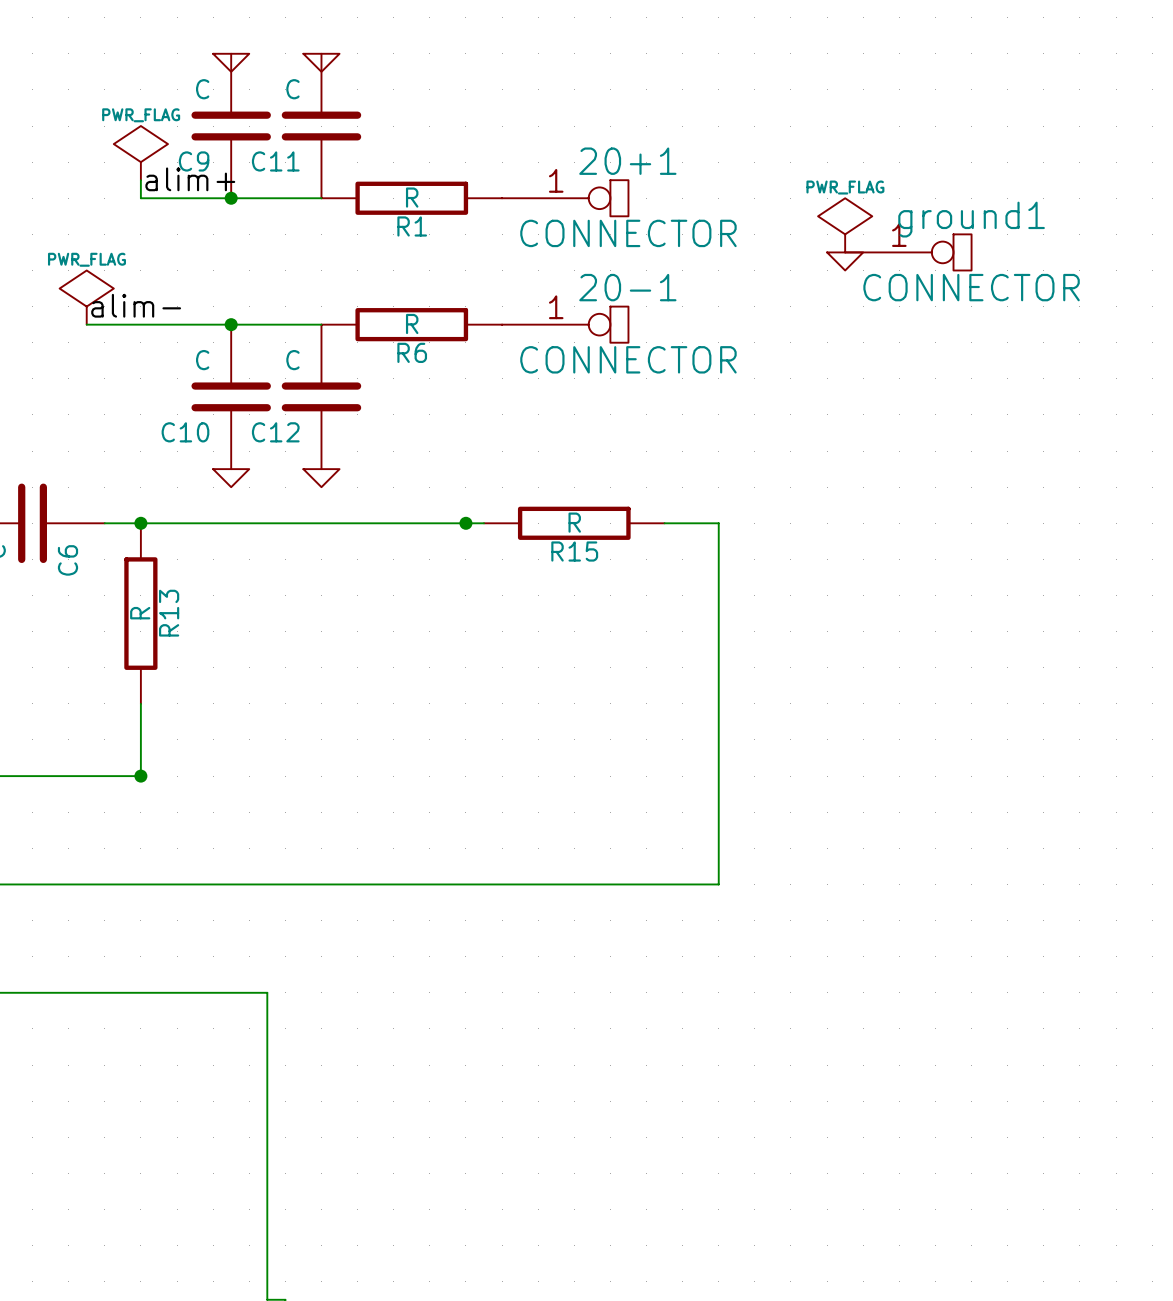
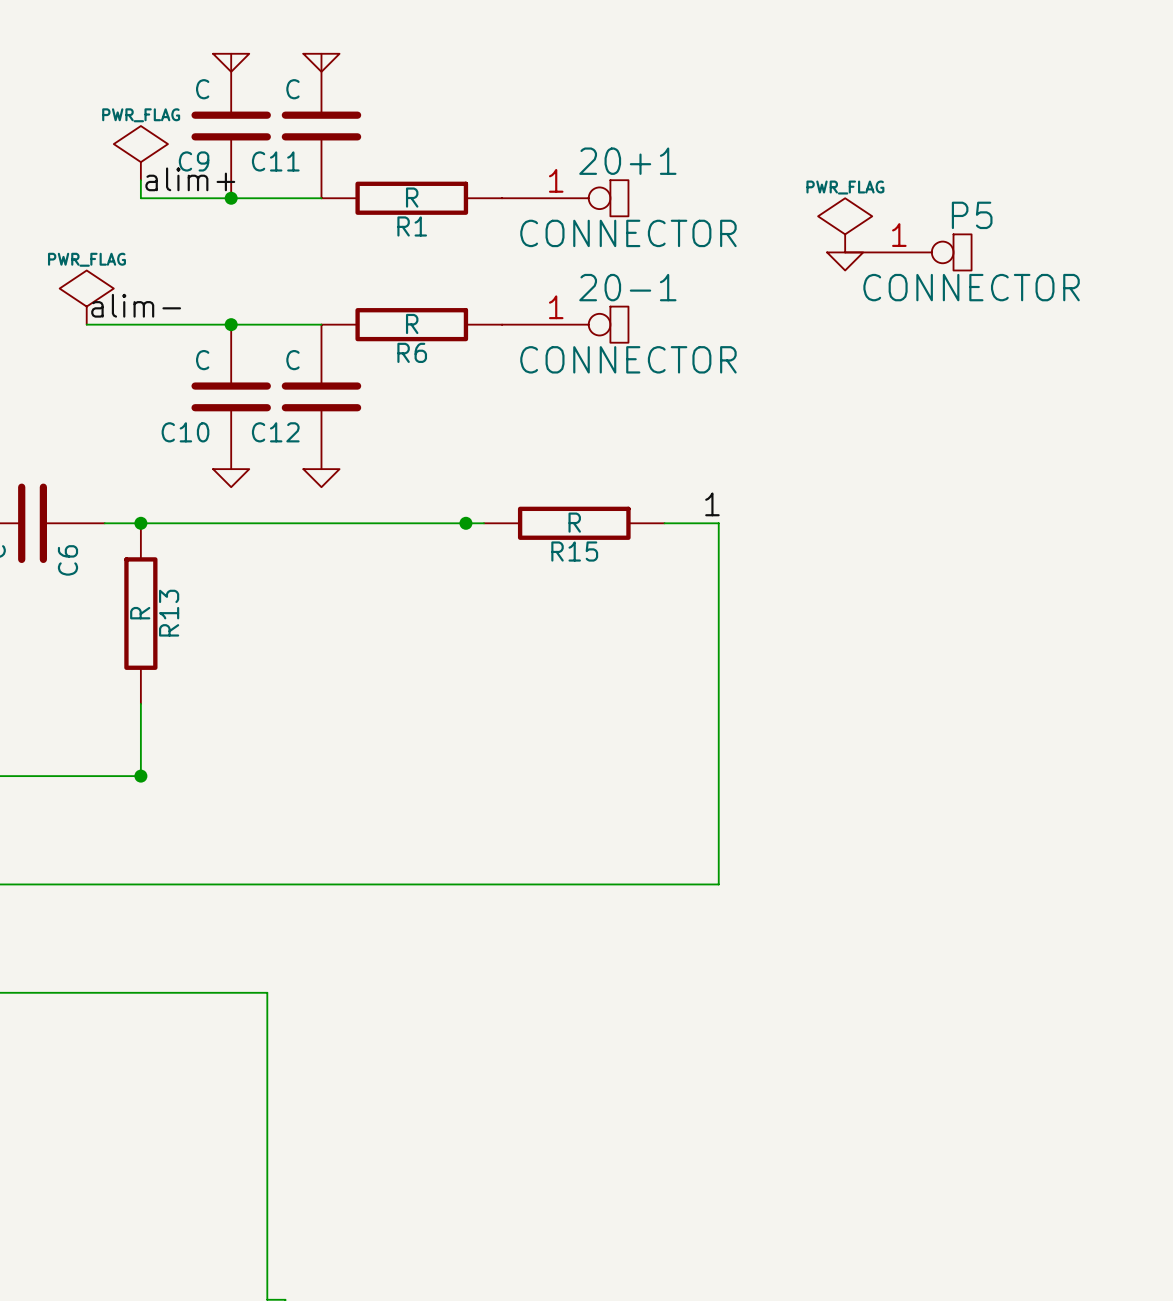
ground1 name: ground1 (971, 219) -> P5 (972, 215)
label: none -> 1 (712, 504)

